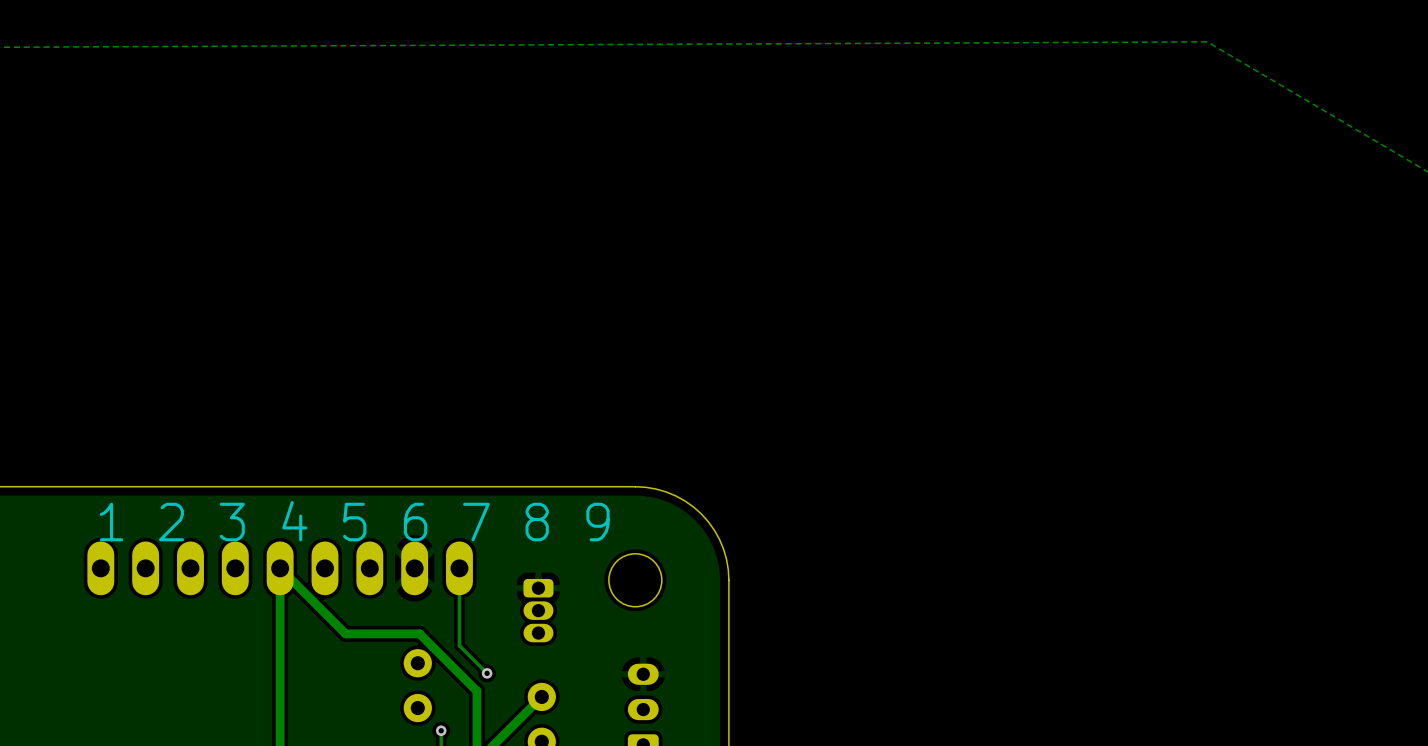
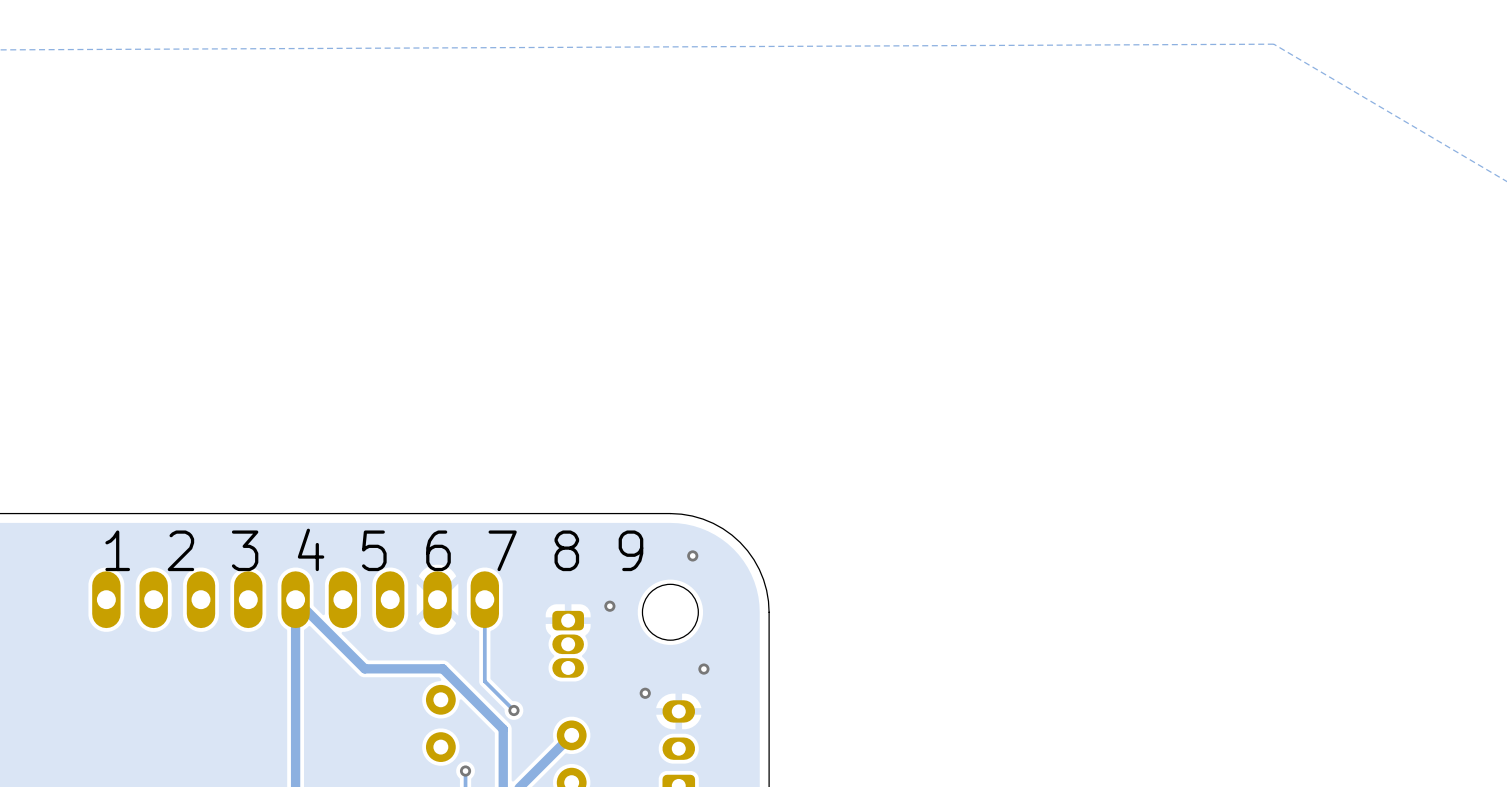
via: none -> (692, 555)
via: none -> (609, 606)
via: none -> (703, 669)
via: none -> (645, 693)

